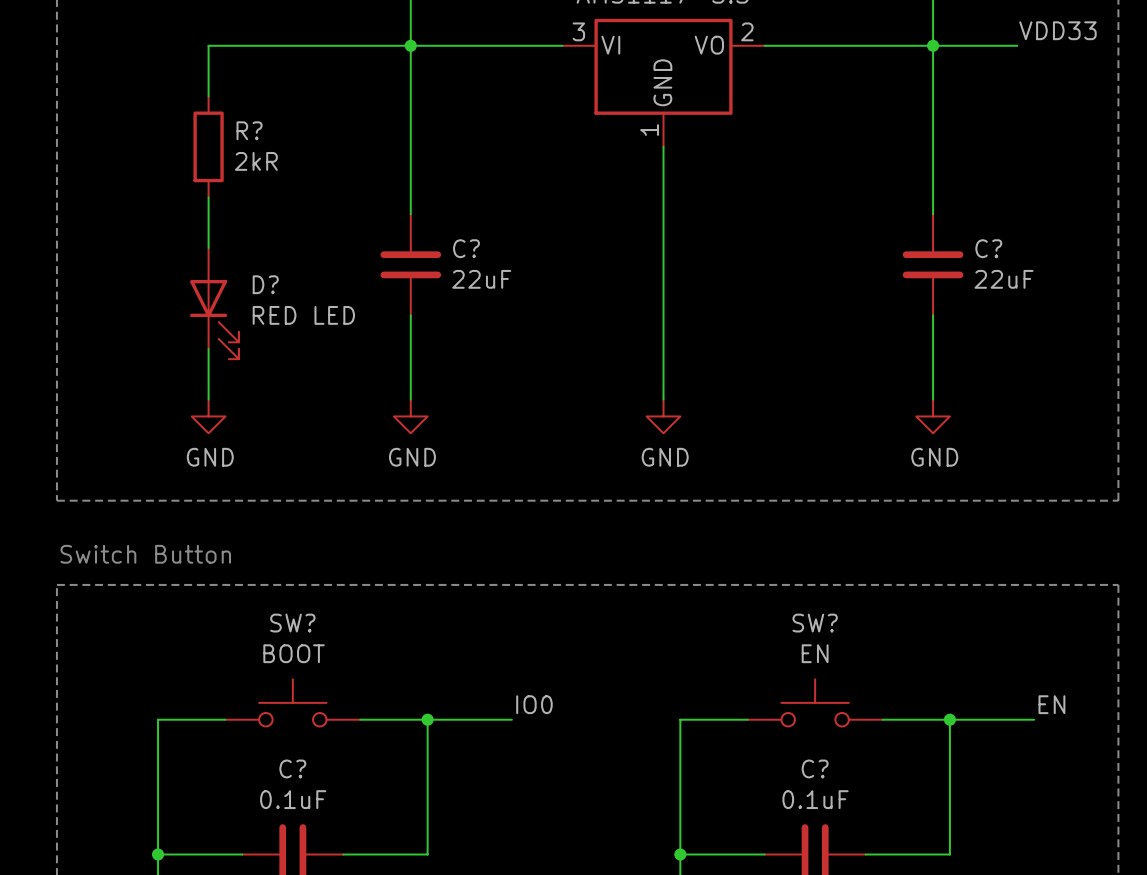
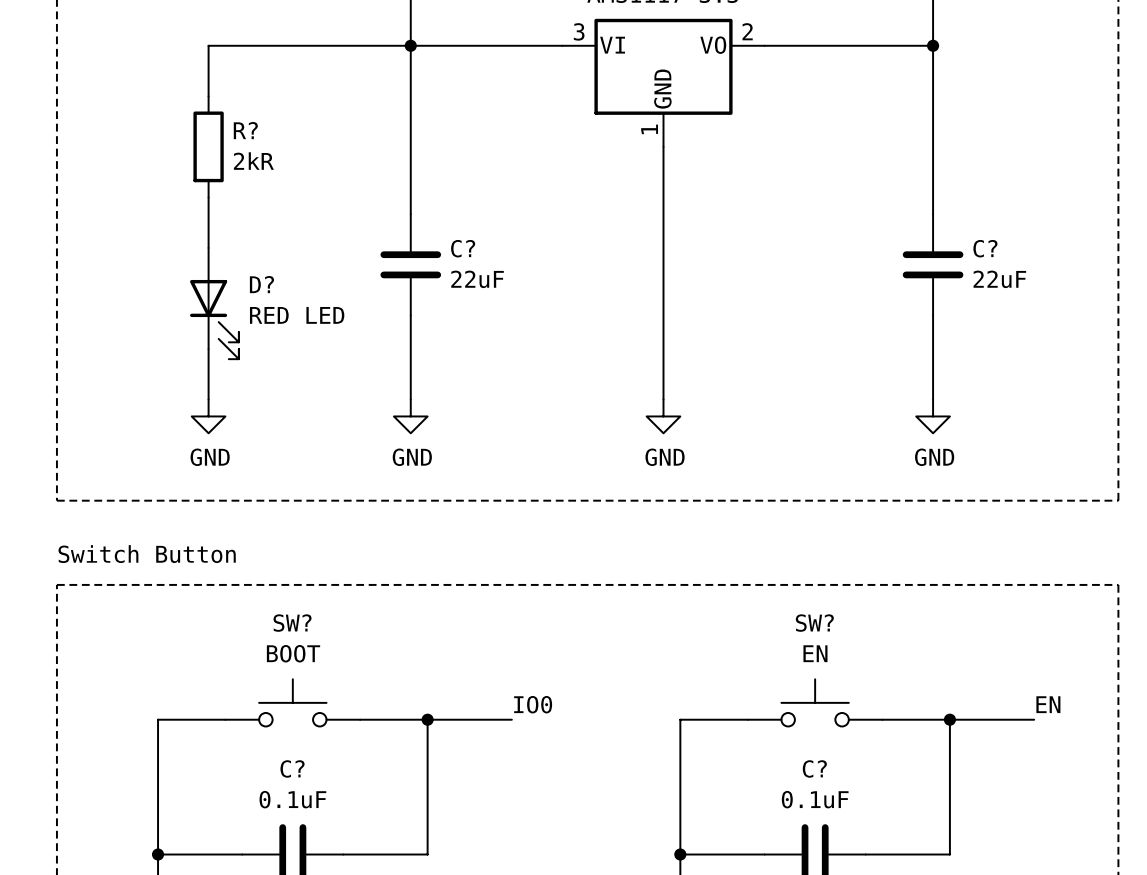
label: VDD33 (1057, 30) -> none
wire: (933, 45) (1017, 45) -> none

